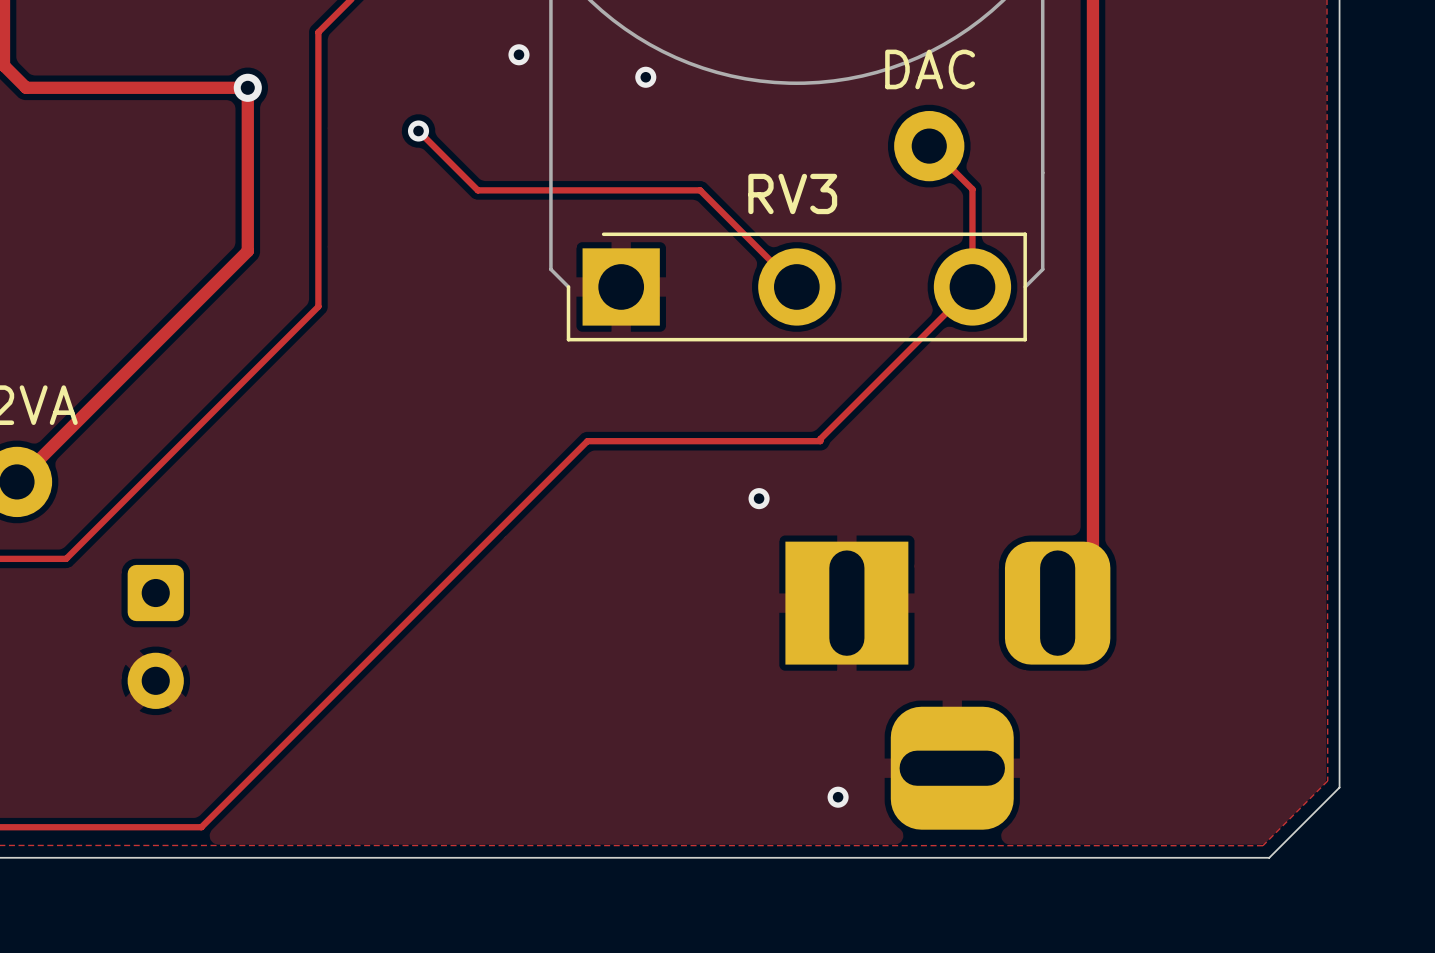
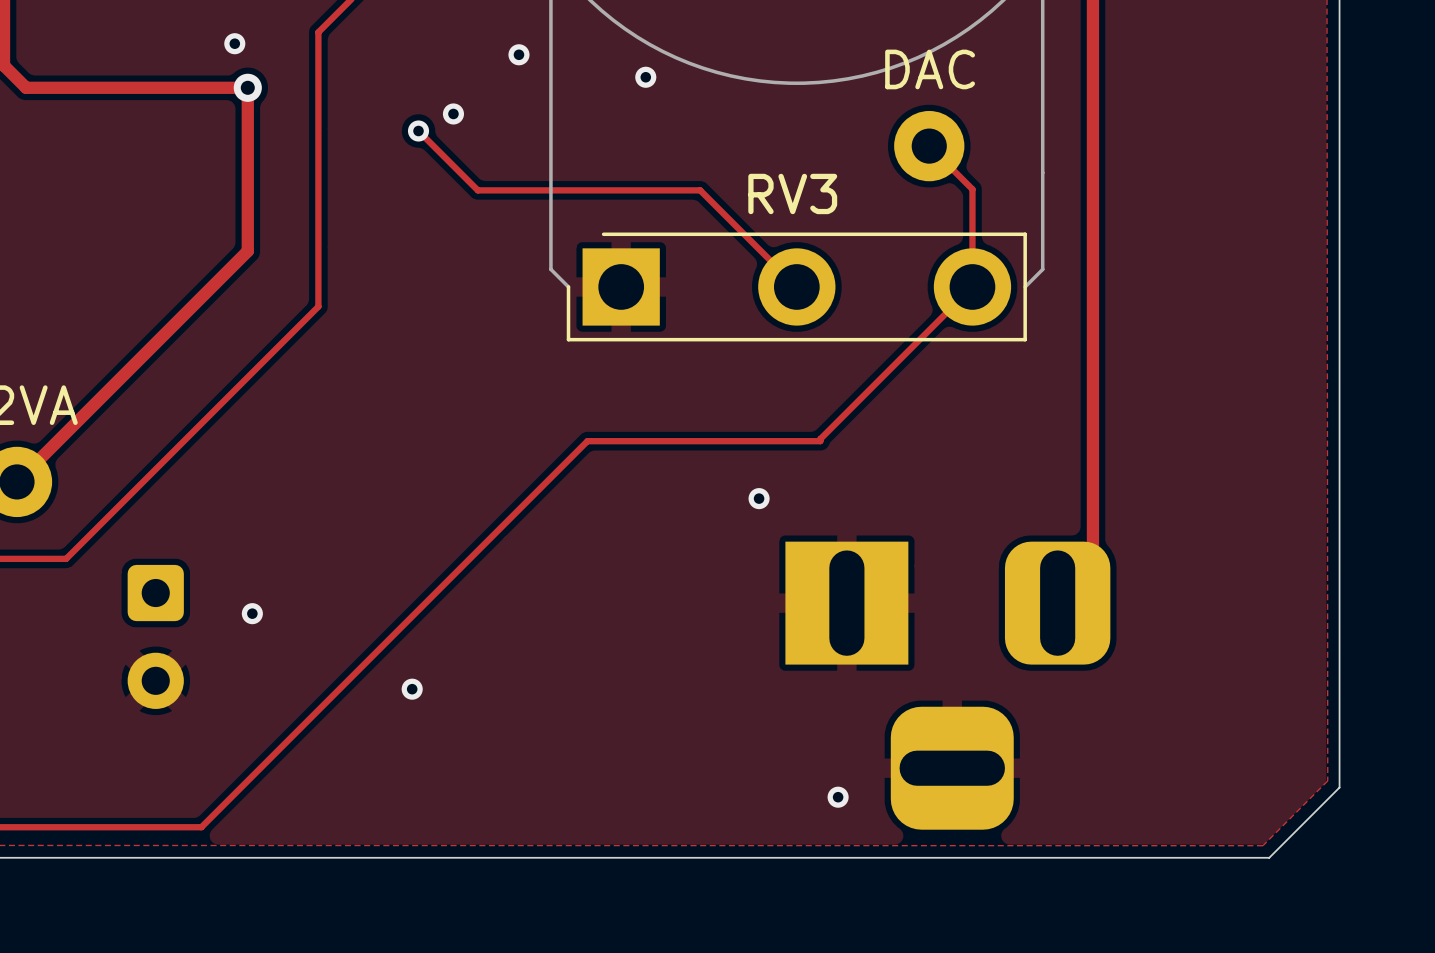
via: none -> (234, 43)
via: none -> (453, 113)
via: none -> (252, 613)
via: none -> (412, 689)

